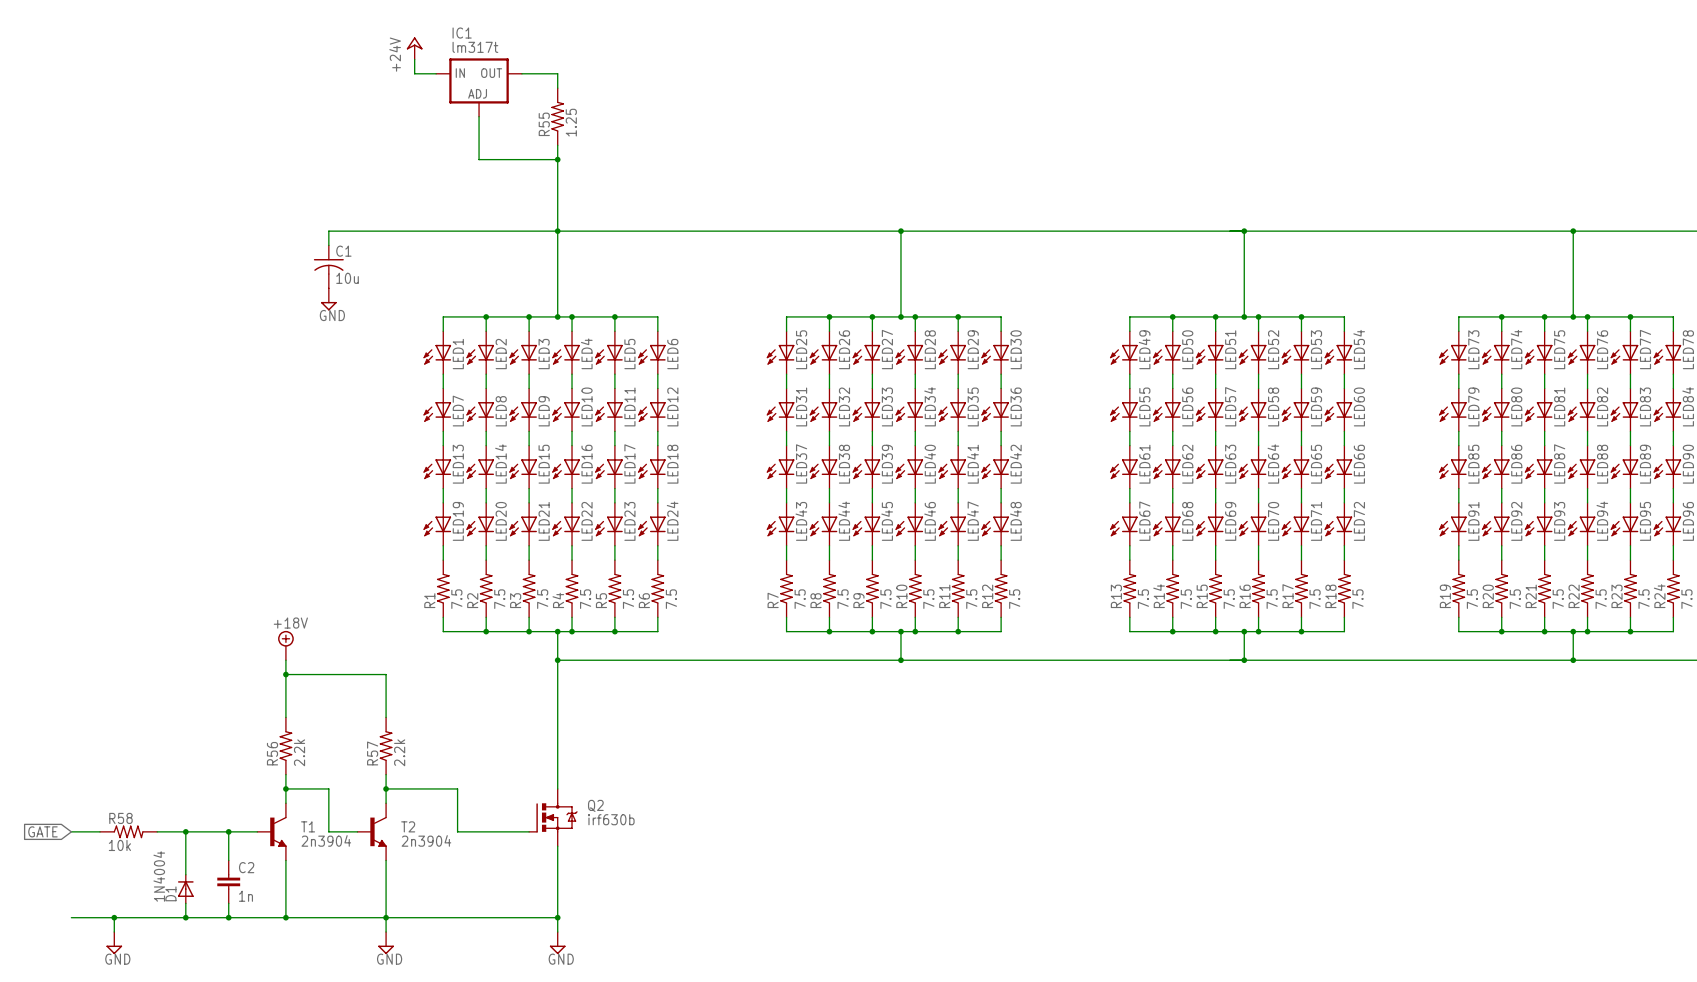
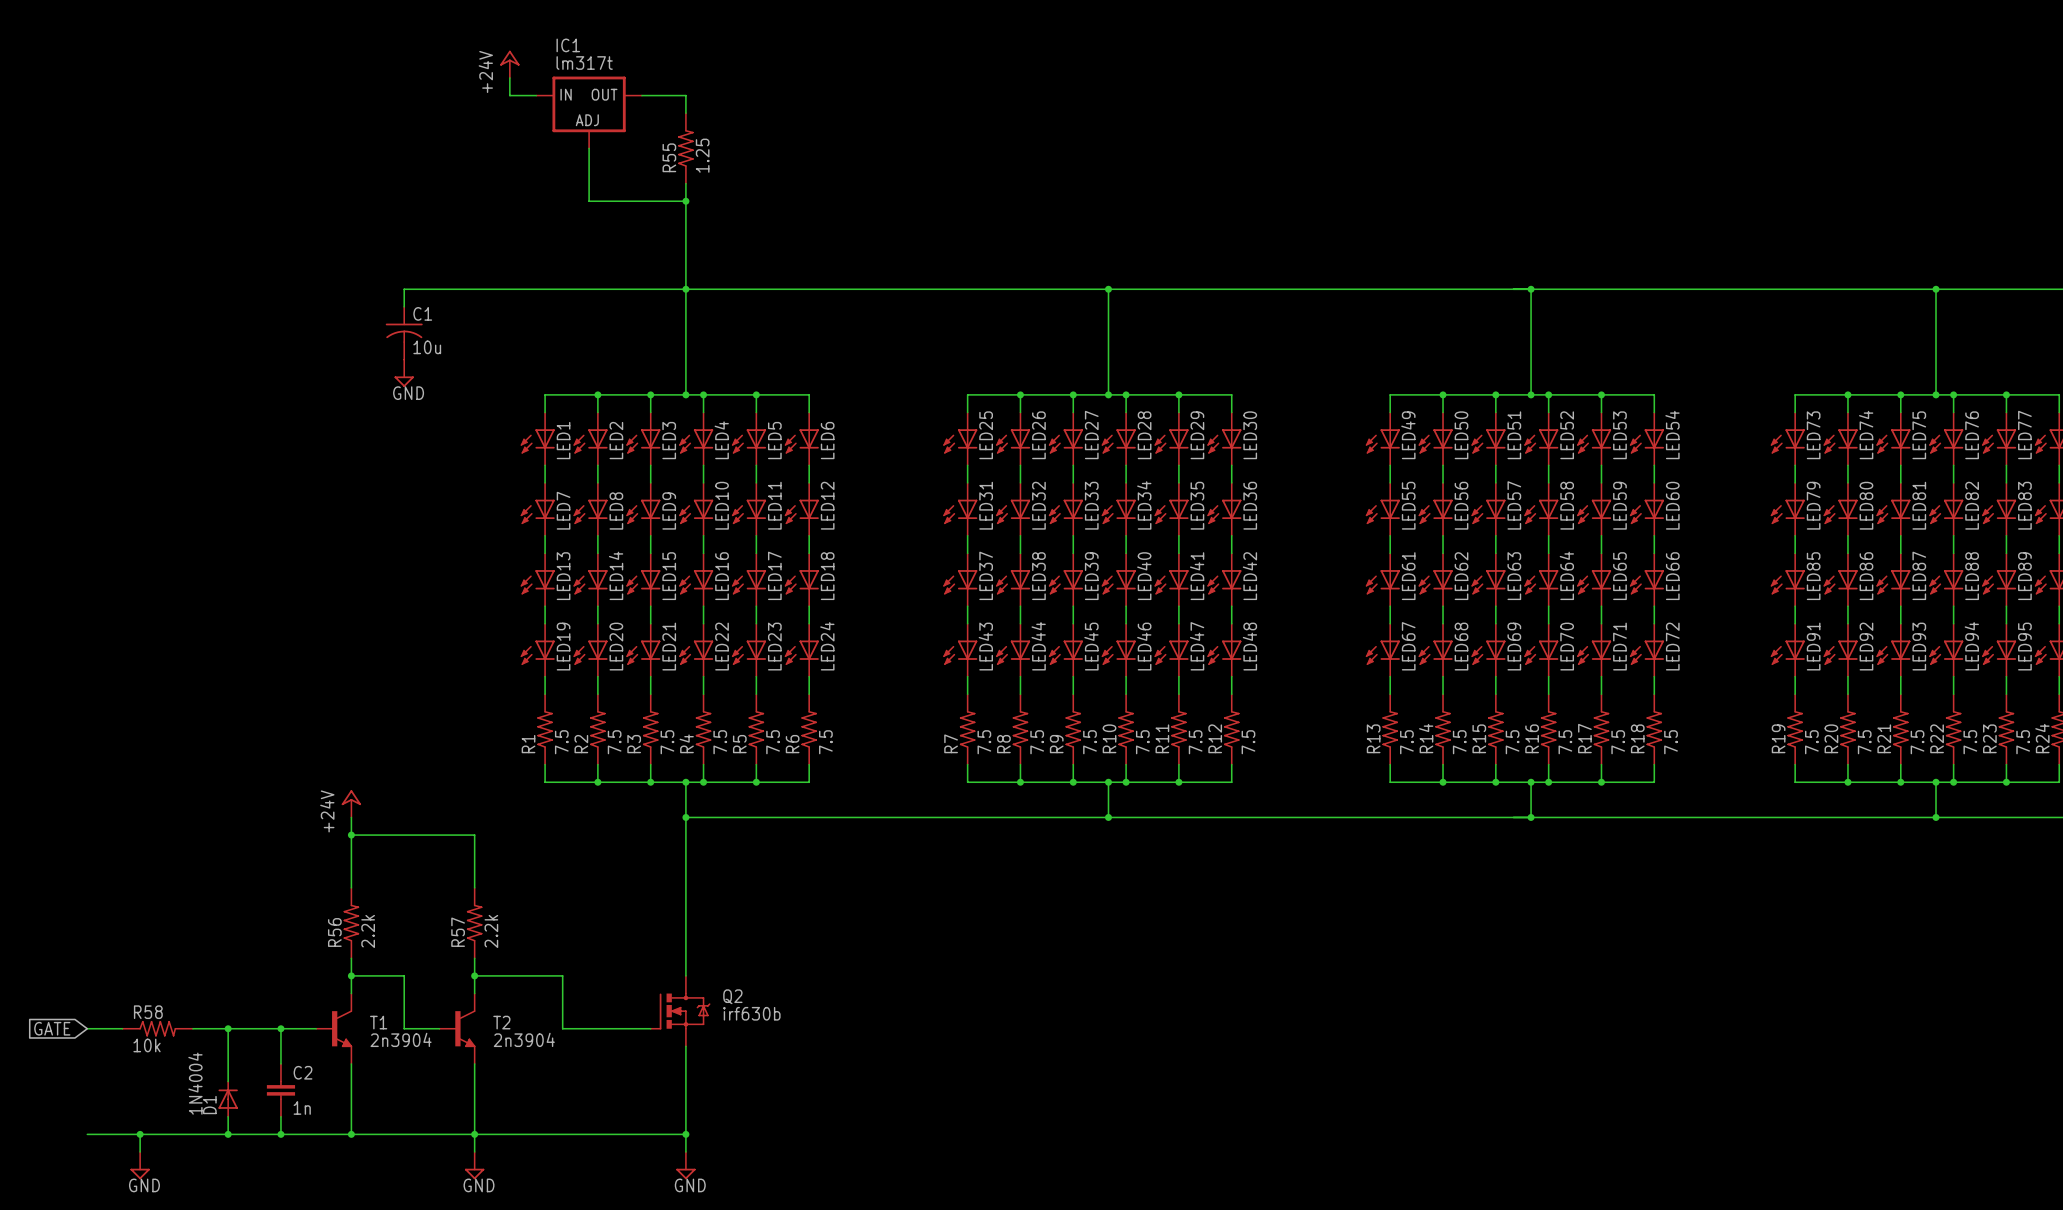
power symbol: +18V (285, 645) -> +24V (351, 803)

